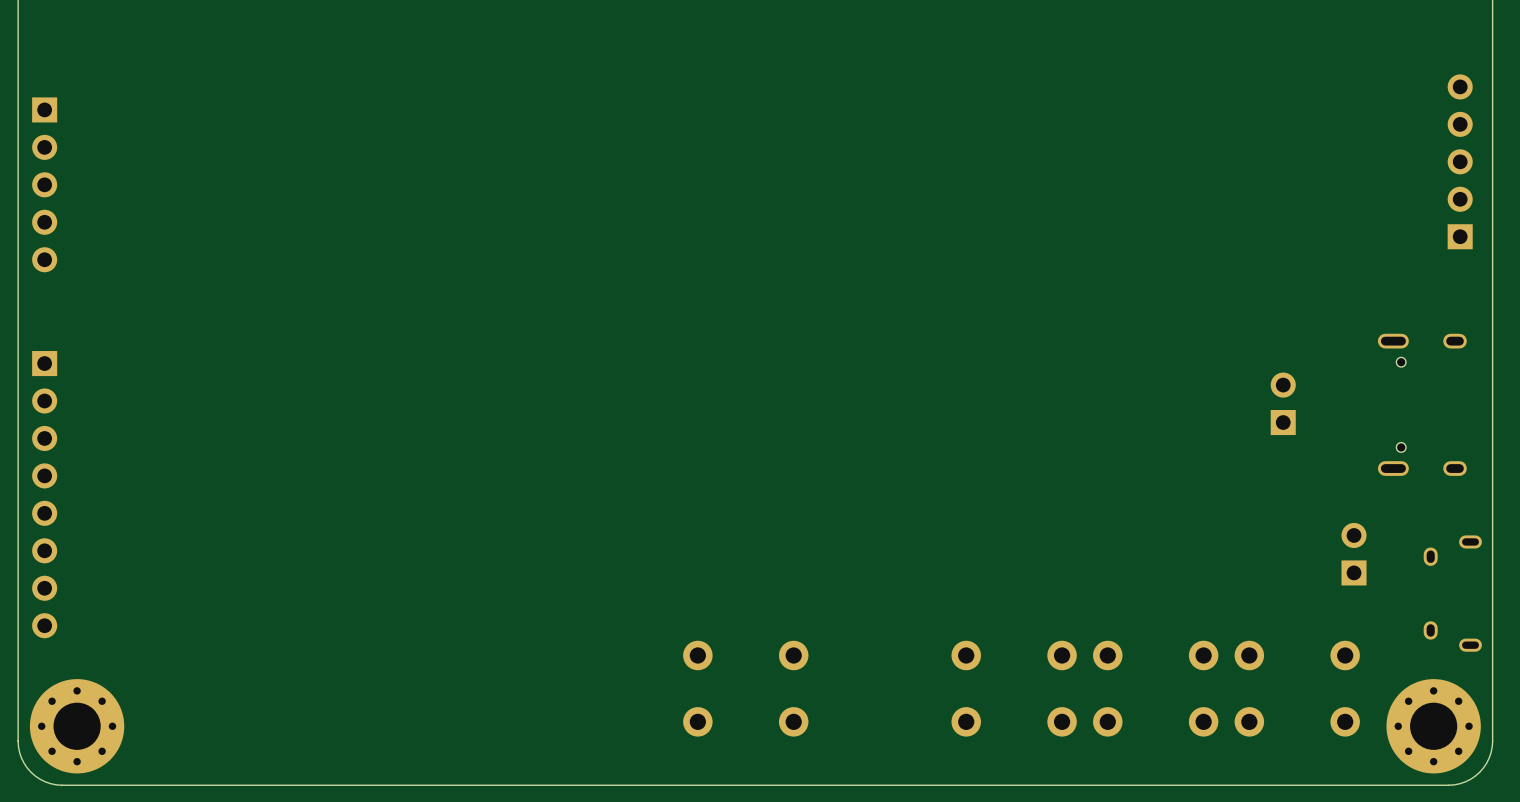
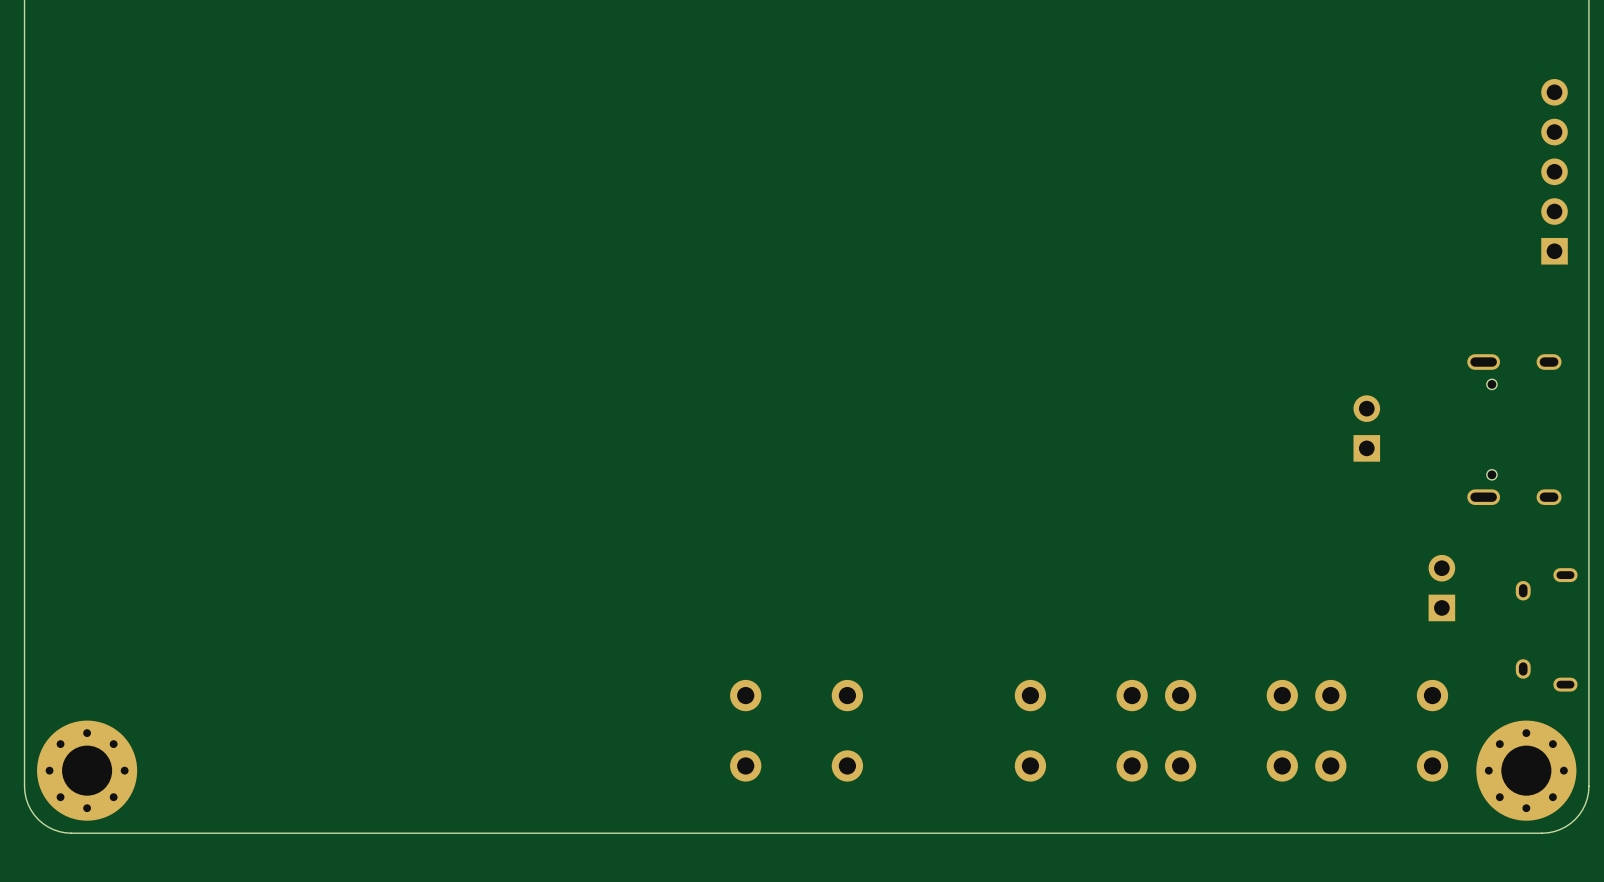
part: (44, 184) -> none
part: (44, 494) -> none

